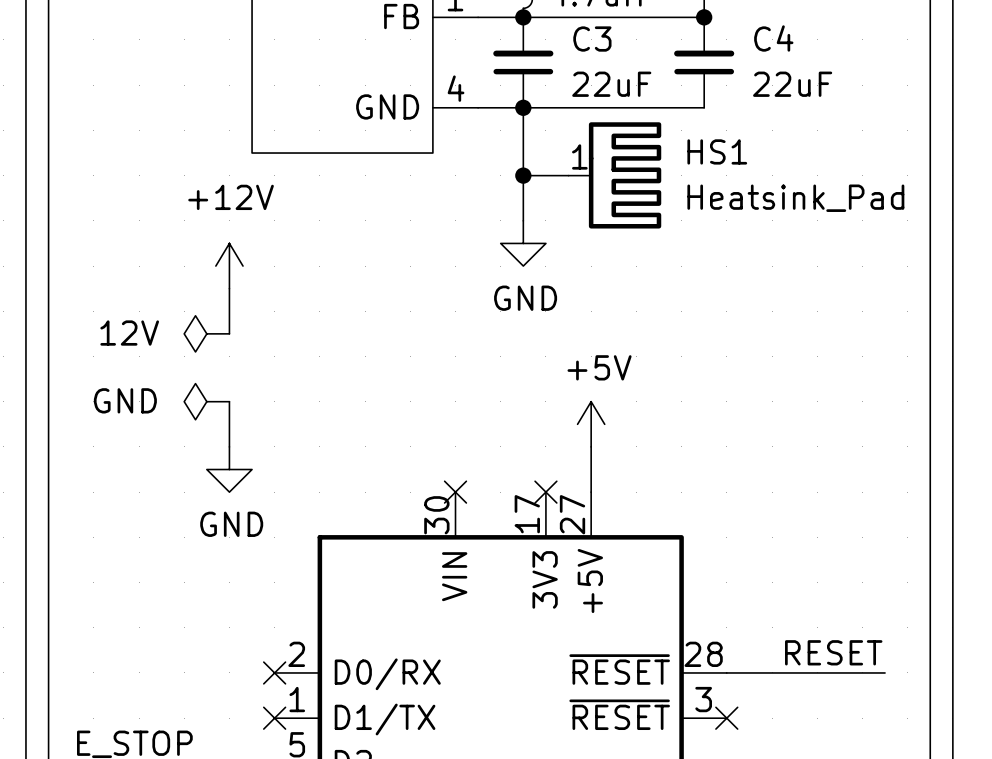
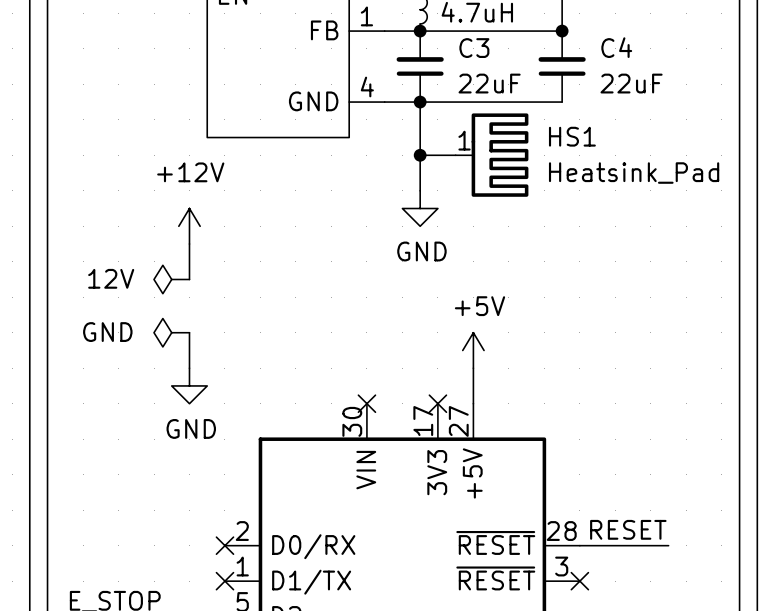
label position: RESET (833, 652) -> RESET (628, 529)
wire: (839, 672) (885, 672) -> none

